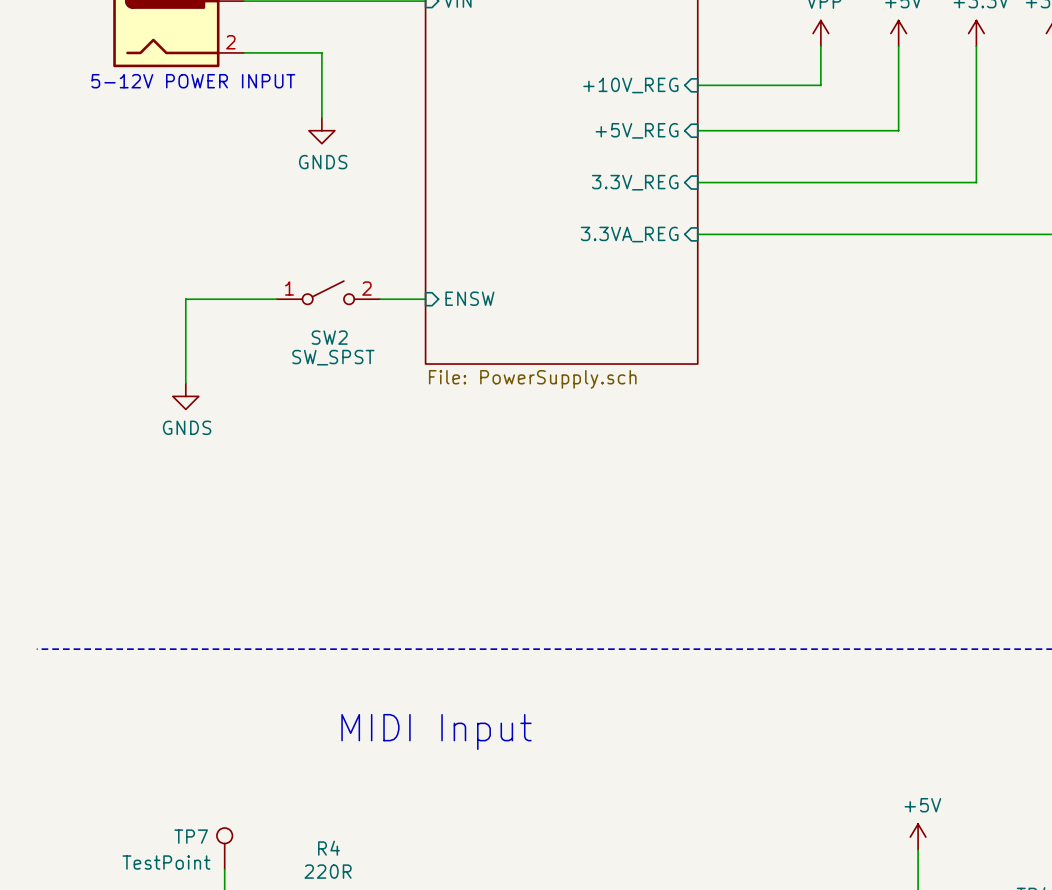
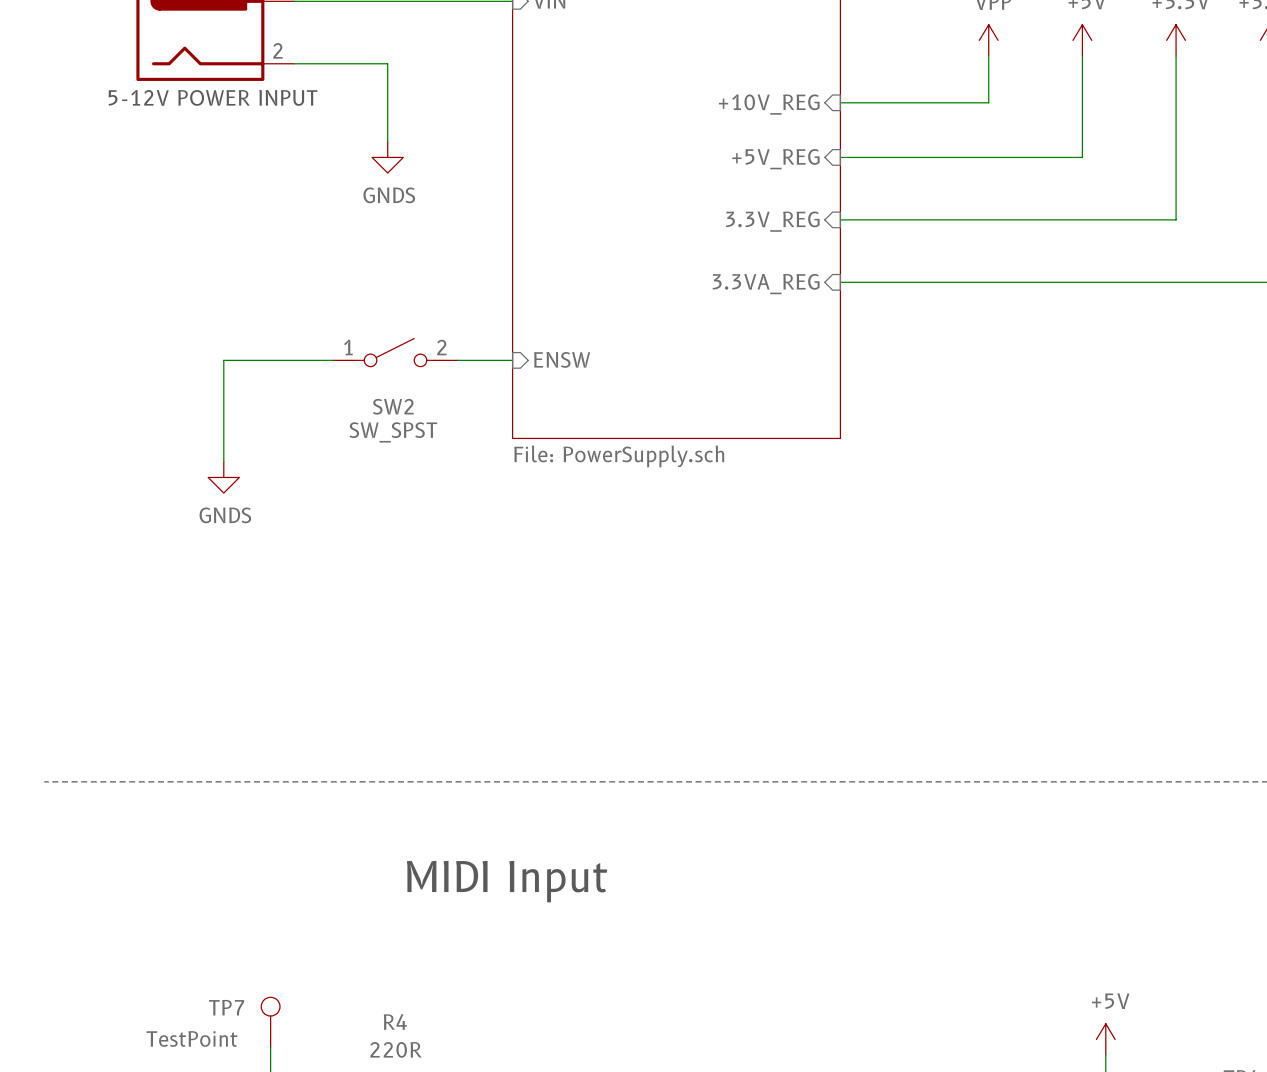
power symbol position: +5V (918, 837) -> +5V (1105, 1039)

